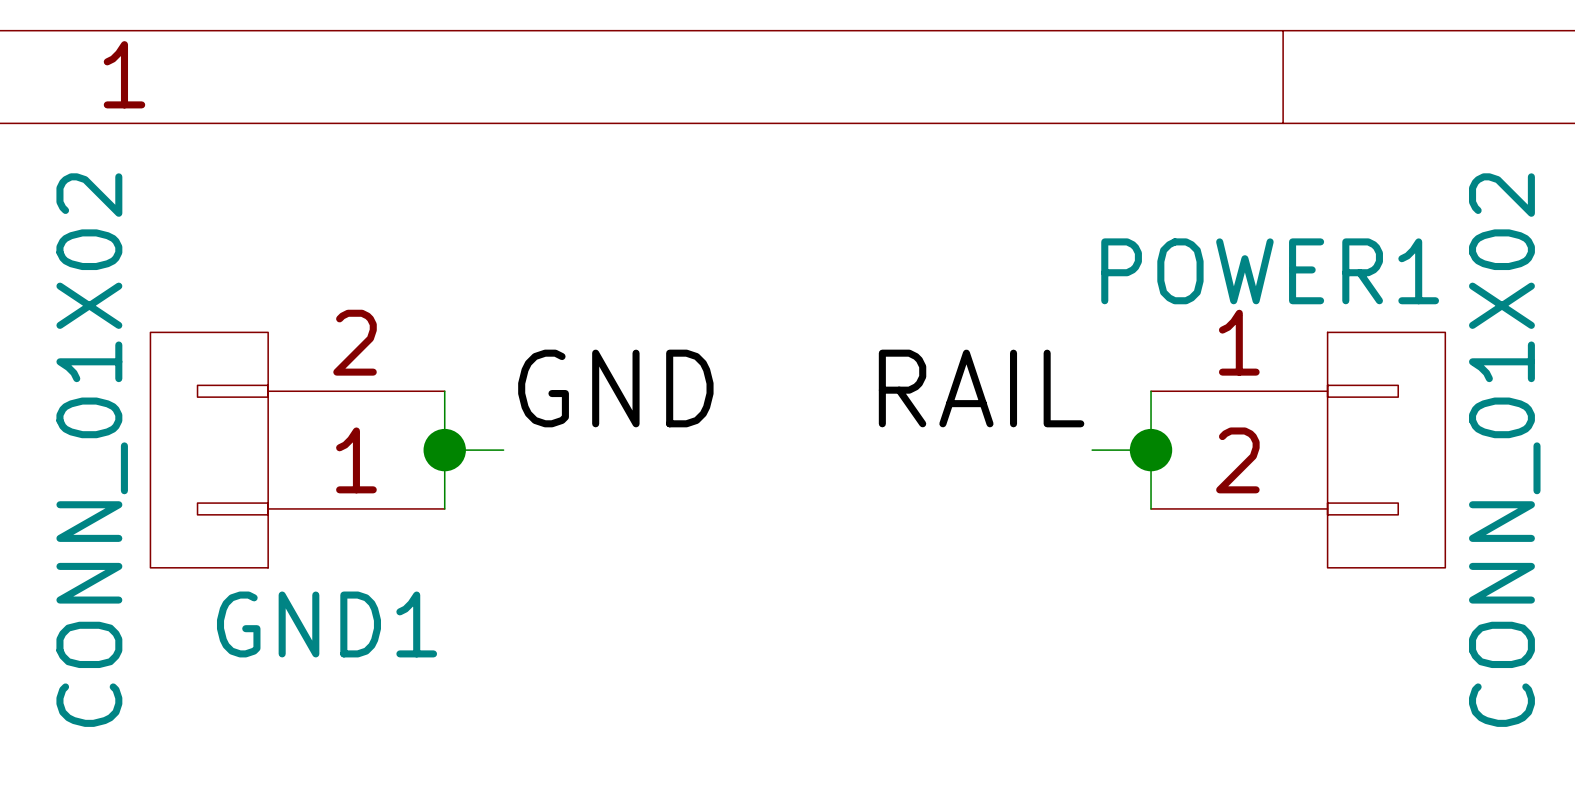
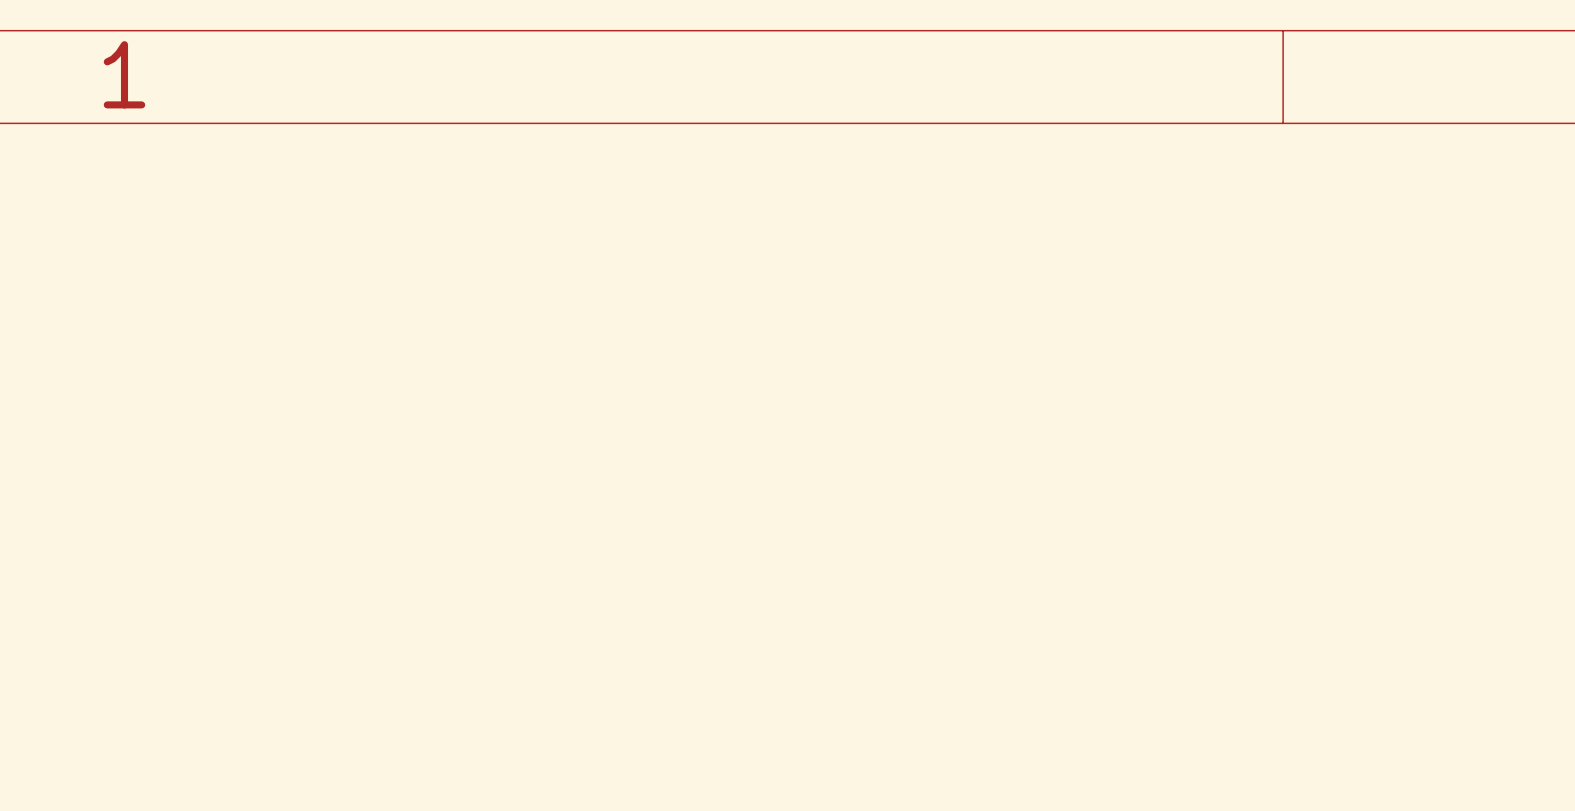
label: GND (615, 388) -> none
label: RAIL (981, 388) -> none
wire: (444, 391) (444, 508) -> none
wire: (1151, 391) (1151, 508) -> none
GND1: CONN_01X02 (297, 450) -> none
wire: (444, 450) (503, 450) -> none
junction: (444, 450) -> none
wire: (1092, 450) (1151, 450) -> none
junction: (1151, 450) -> none
POWER1: CONN_01X02 (1298, 450) -> none

